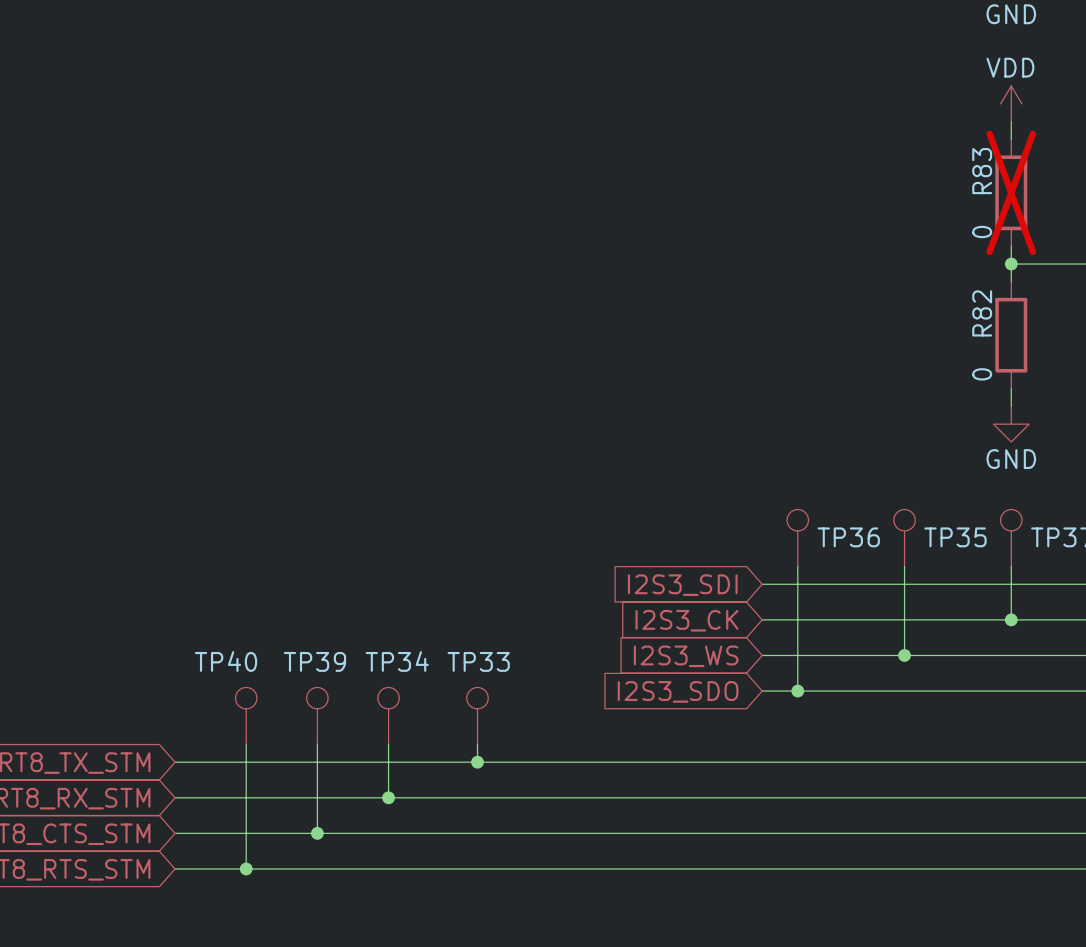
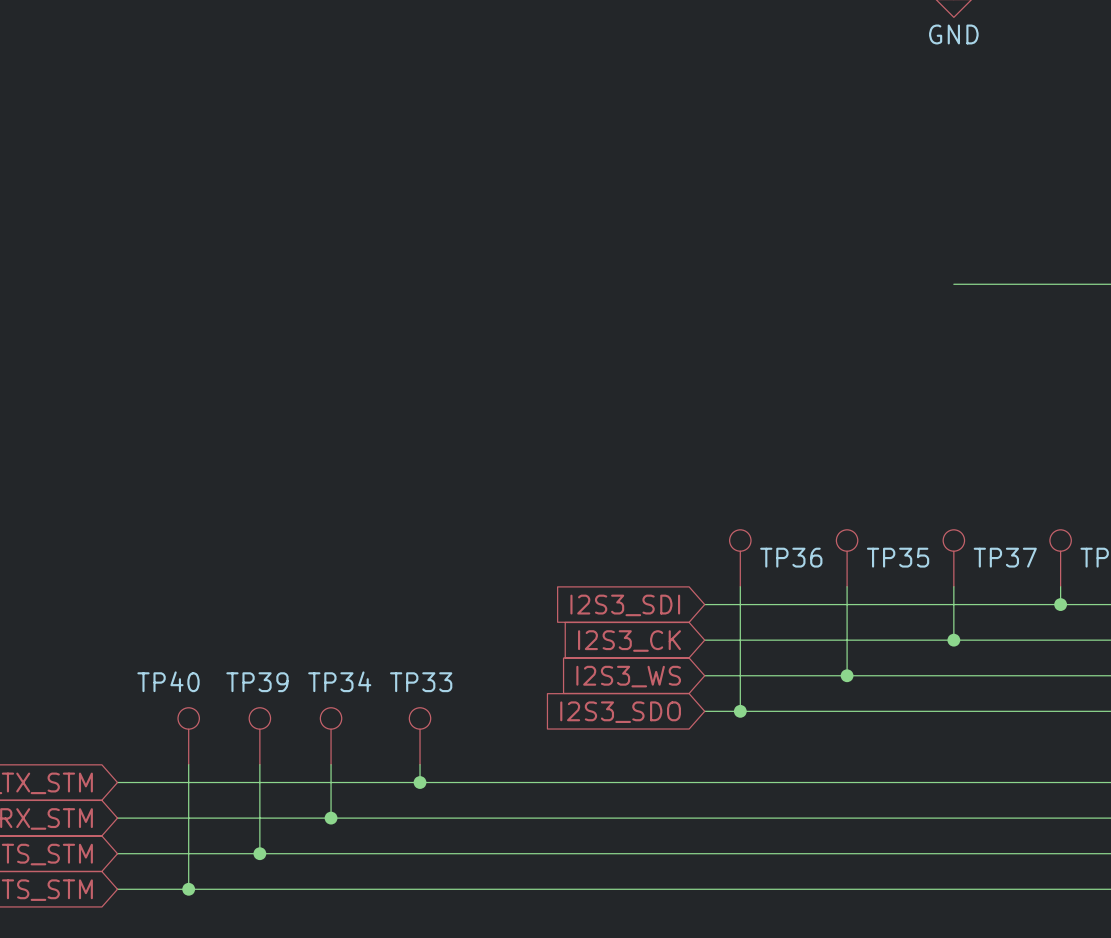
power symbol: VDD (1011, 103) -> none
wire: (1011, 121) (1011, 139) -> none
R83: 0 (1011, 192) -> none
wire: (1011, 246) (1011, 281) -> none
junction: (1011, 264) -> none
R82: 0 (1011, 335) -> none
wire: (1011, 388) (1011, 406) -> none
power symbol: GND (1011, 424) -> none

